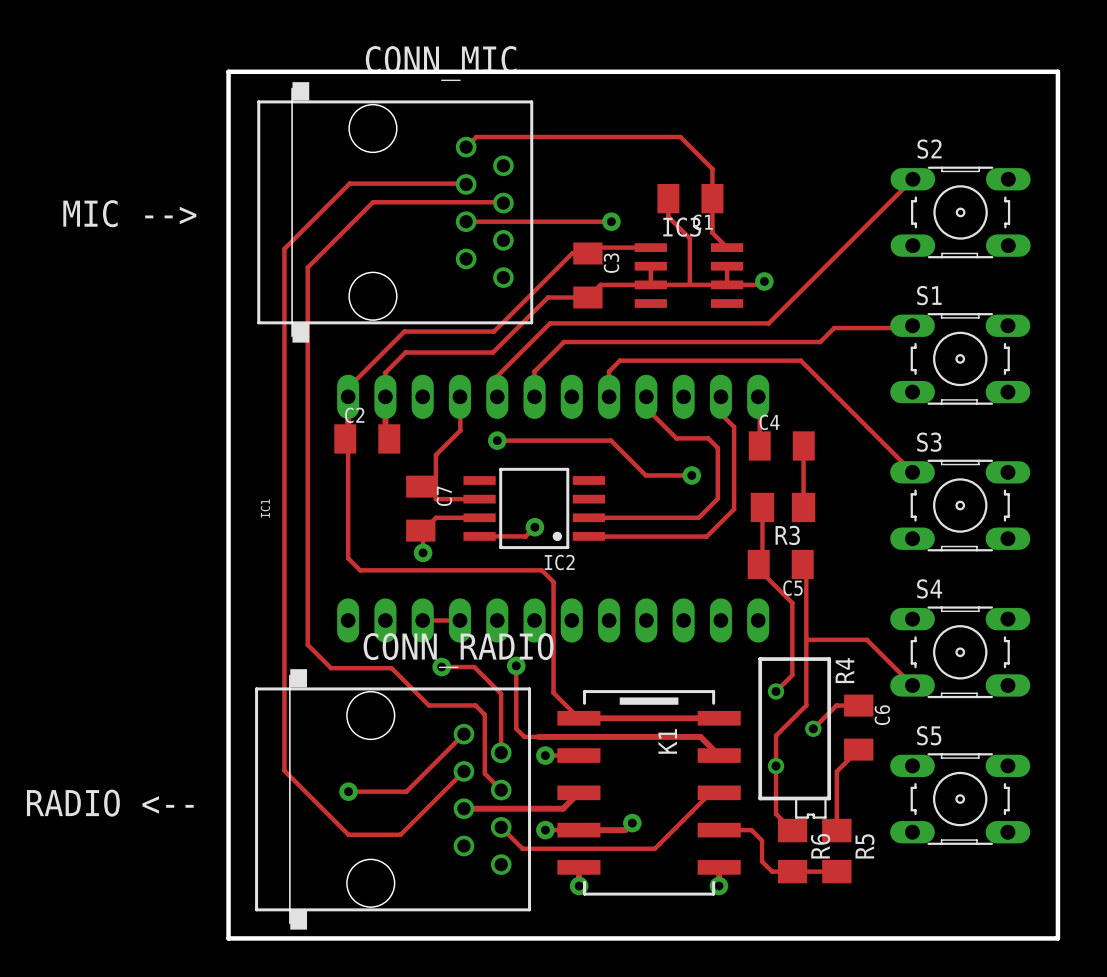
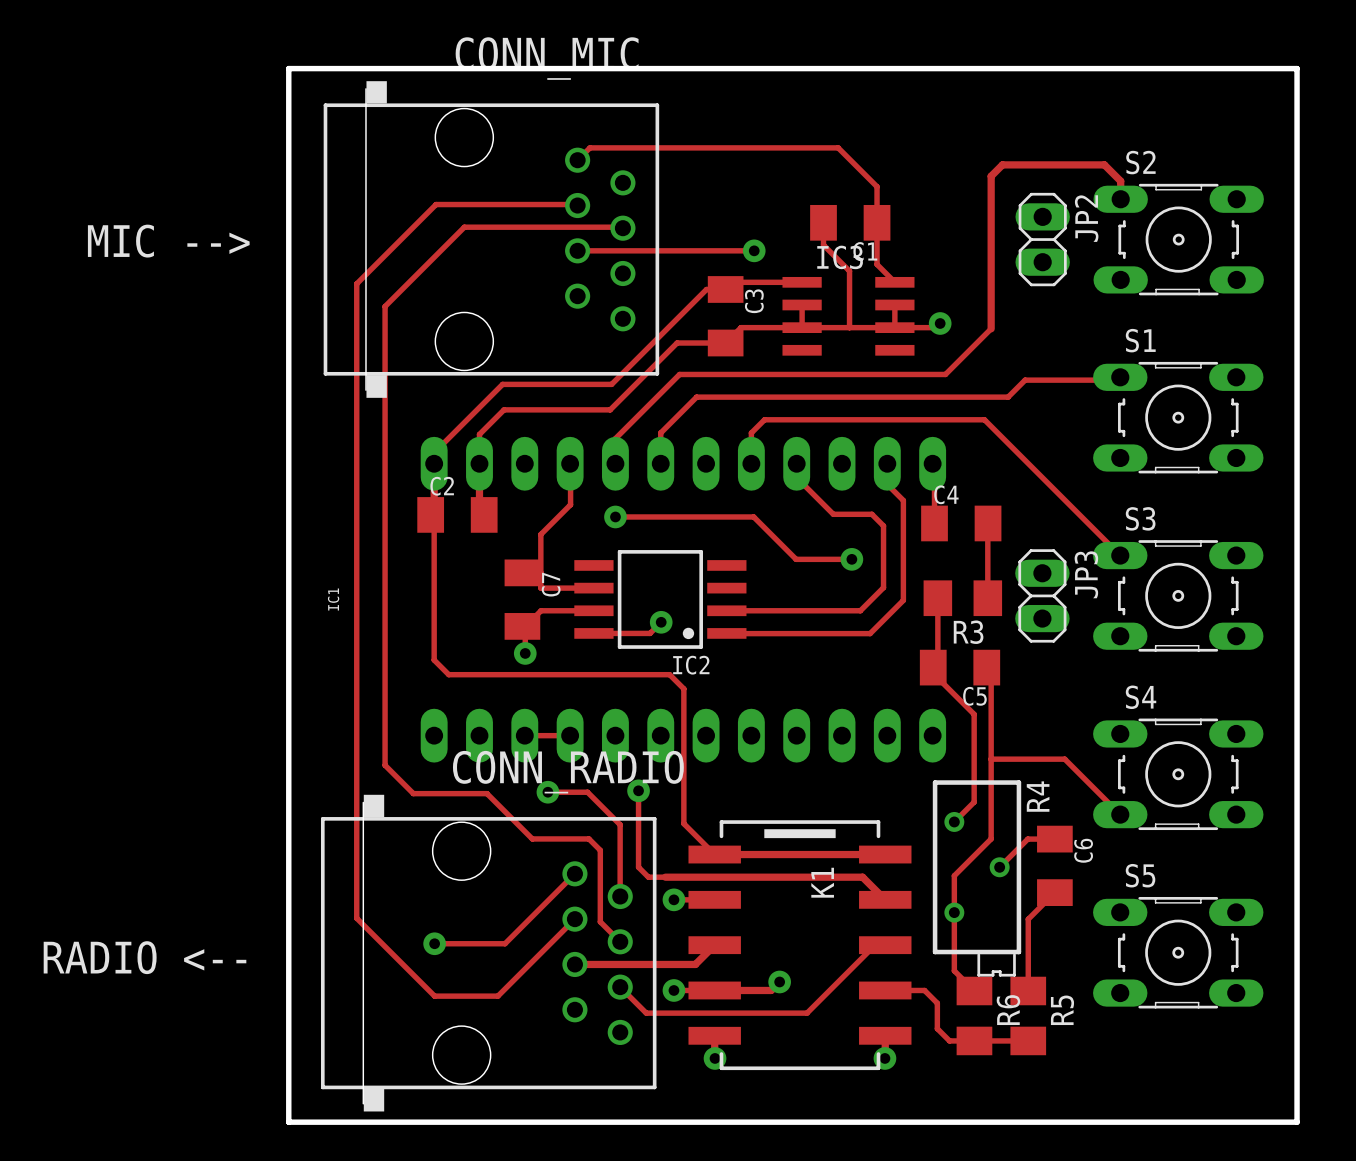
track: (912, 179) (806, 285) -> (1120, 199) (1120, 181) (1104, 164) (1002, 164) (991, 176) (991, 328)
JP2: none -> (1042, 239)
JP3: none -> (1042, 595)

